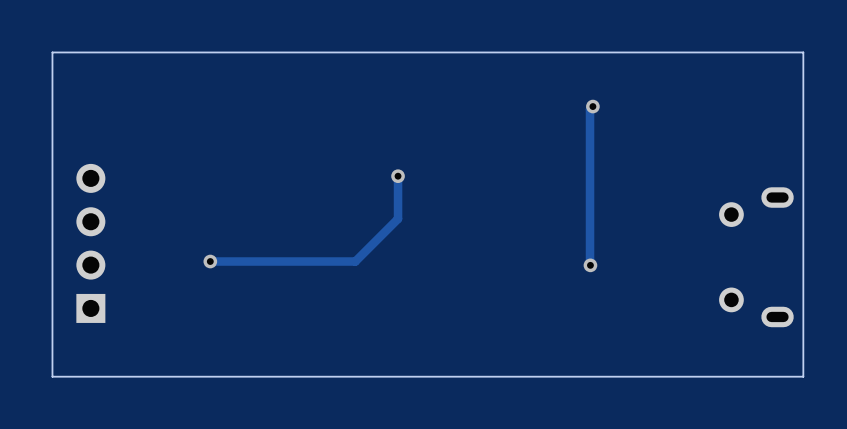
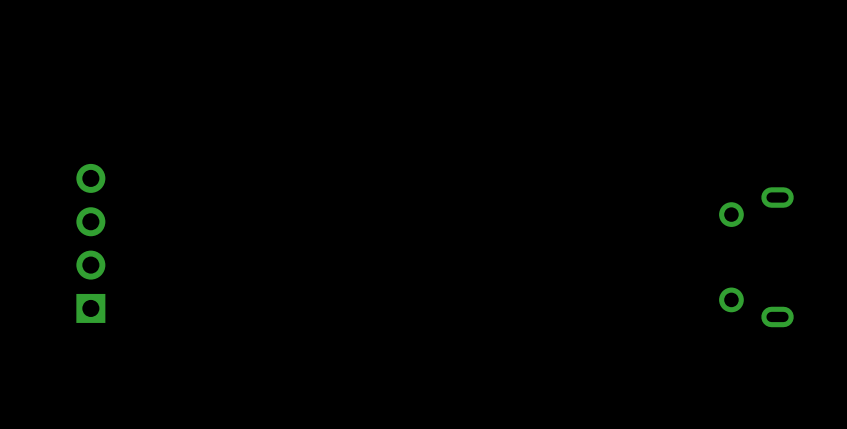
board edge: (803, 52) (52, 52) (52, 376) (803, 376) (803, 52) -> none
track: (592, 106) (590, 109) (590, 265) -> none
via: (592, 106) -> none
track: (398, 176) (398, 218) (355, 261) (210, 261) -> none
via: (398, 176) -> none
via: (210, 261) -> none
via: (590, 265) -> none

